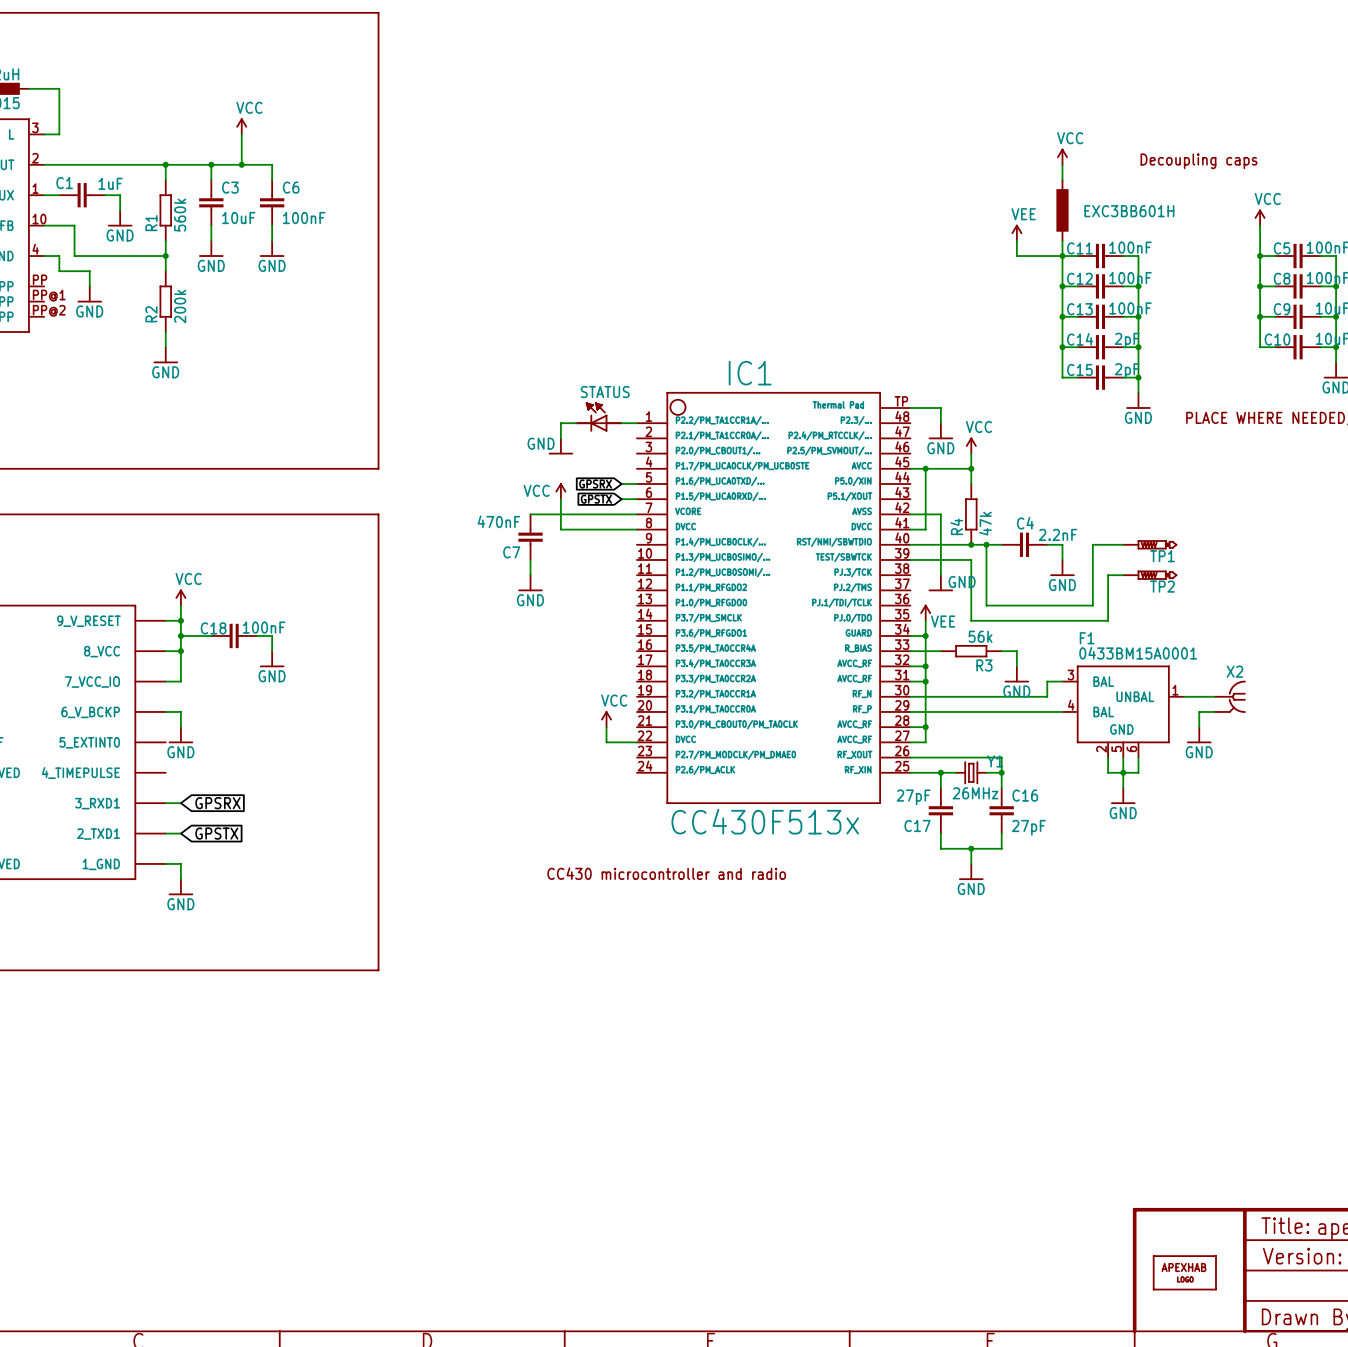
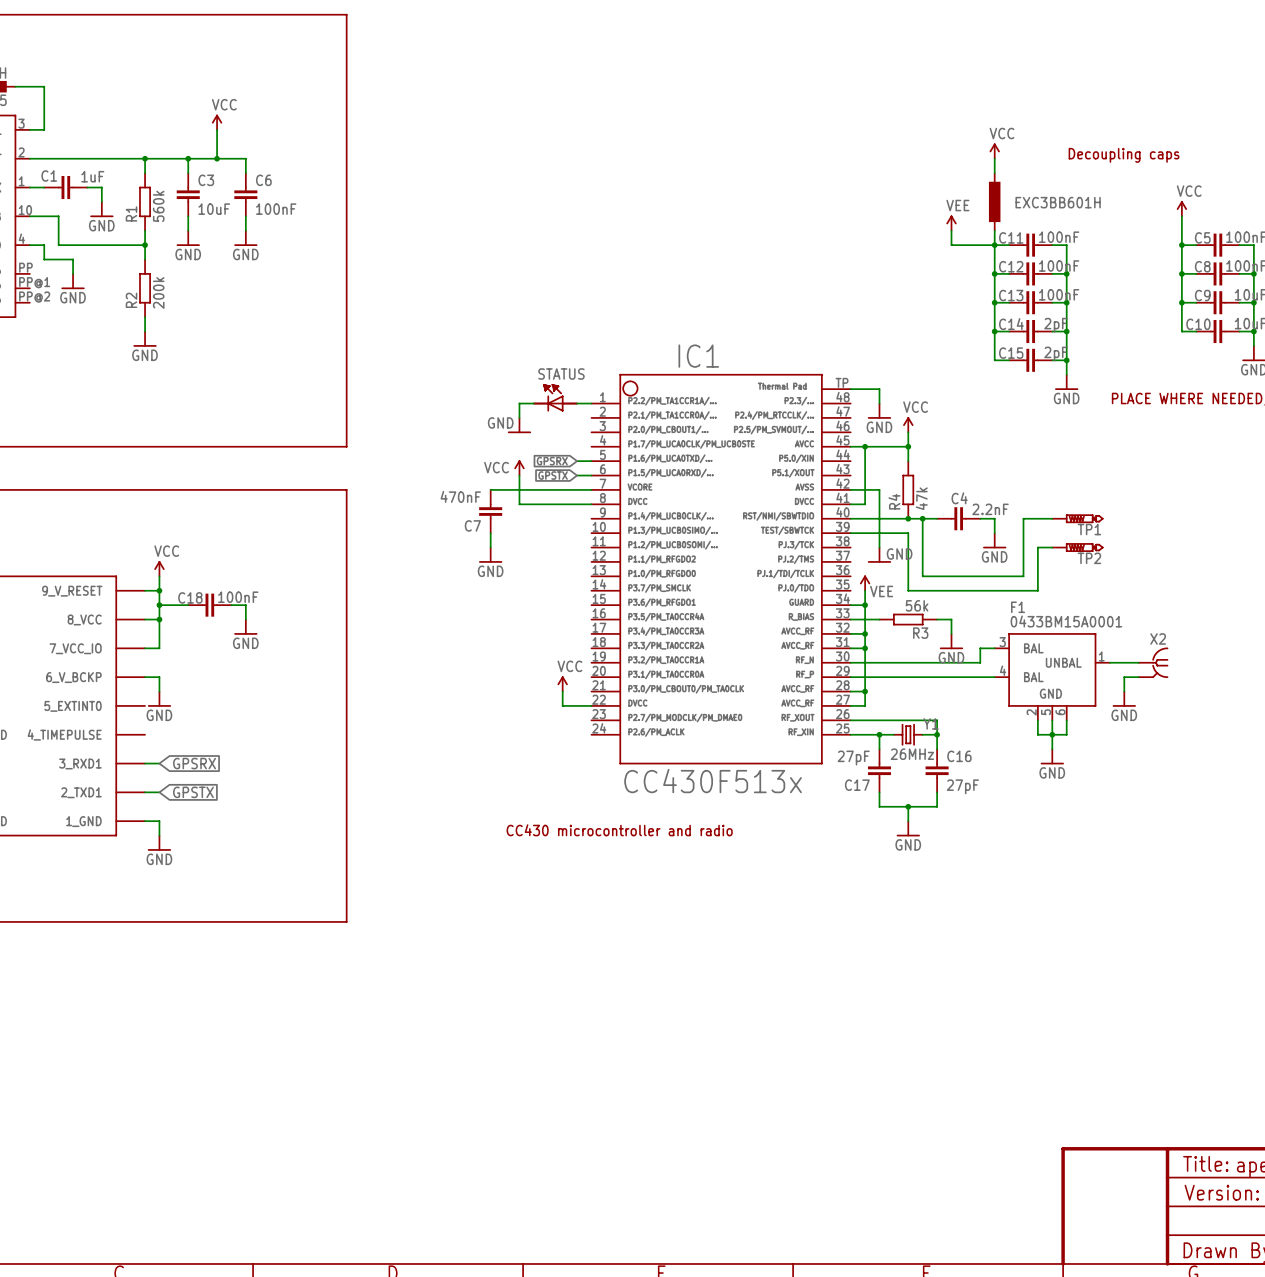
part: (1184, 1272) -> none

